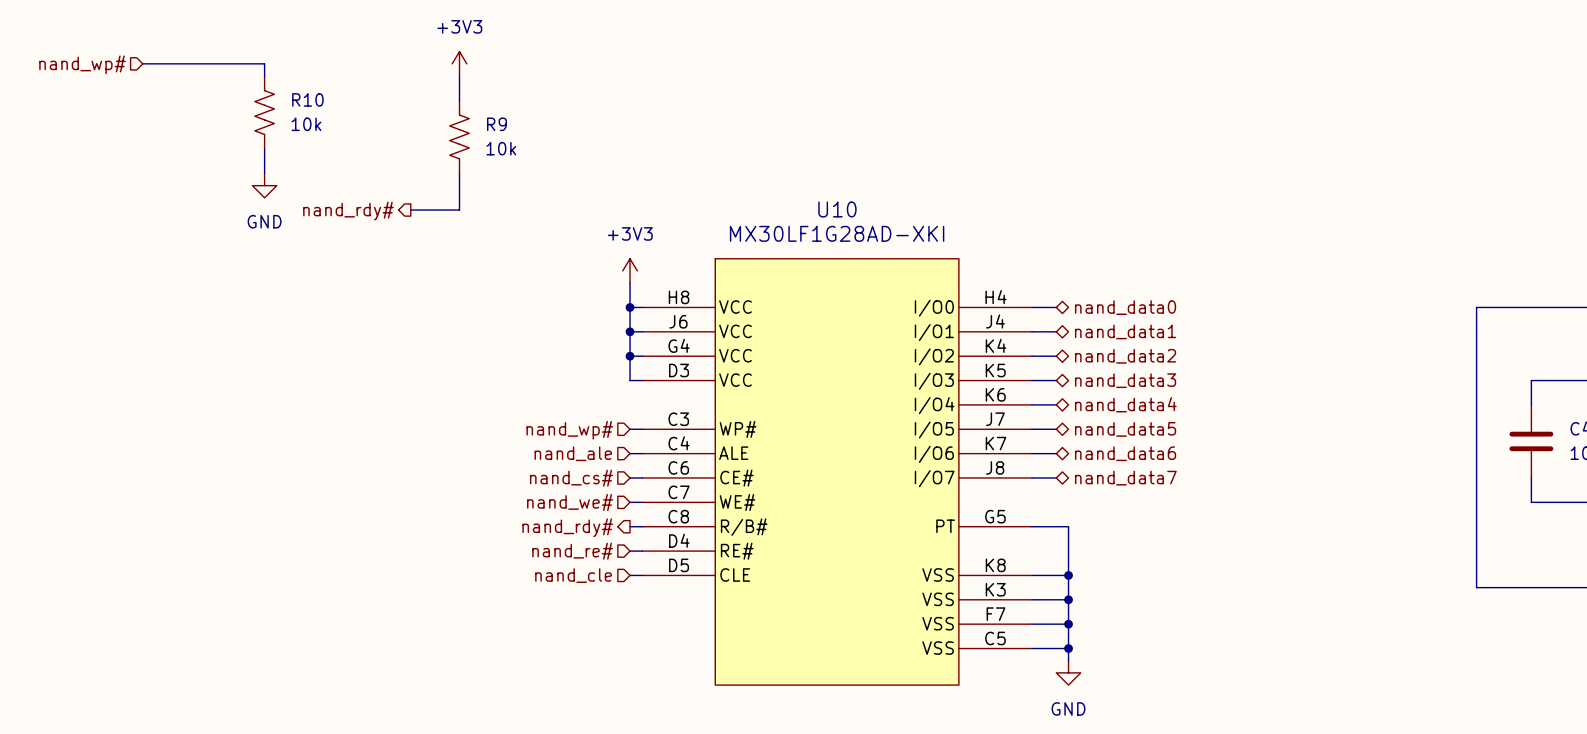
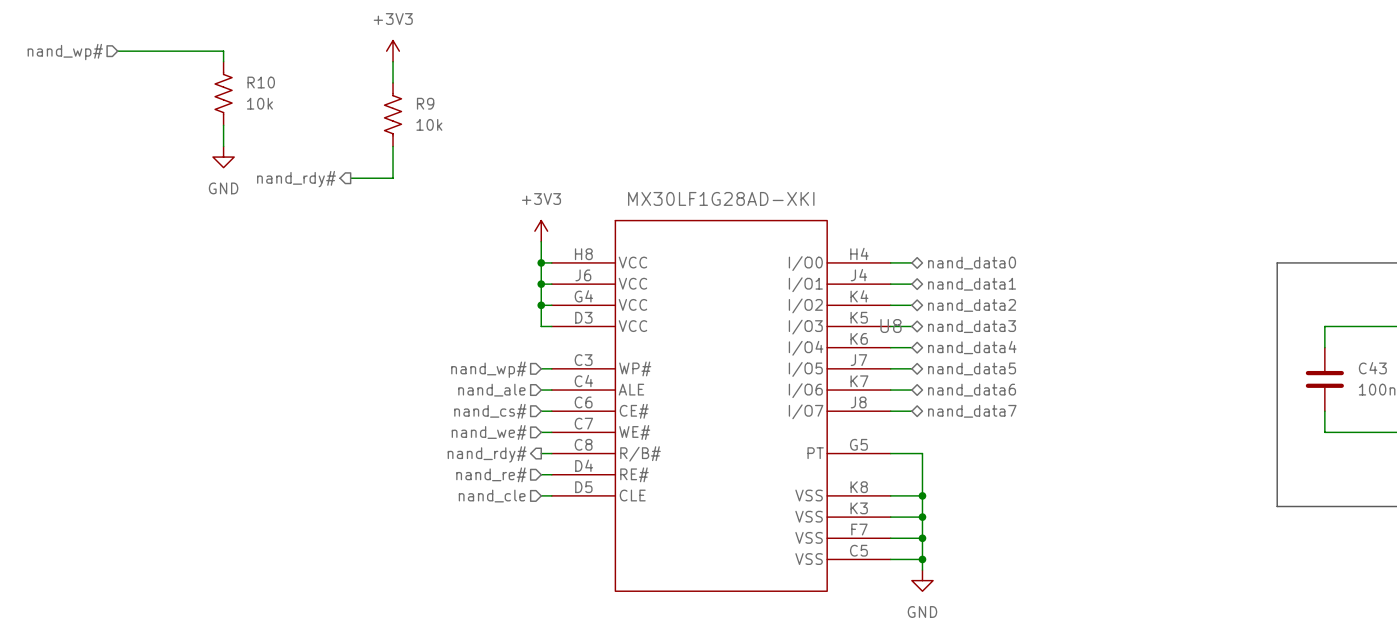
U10 name: U10 (837, 209) -> U8 (891, 326)

